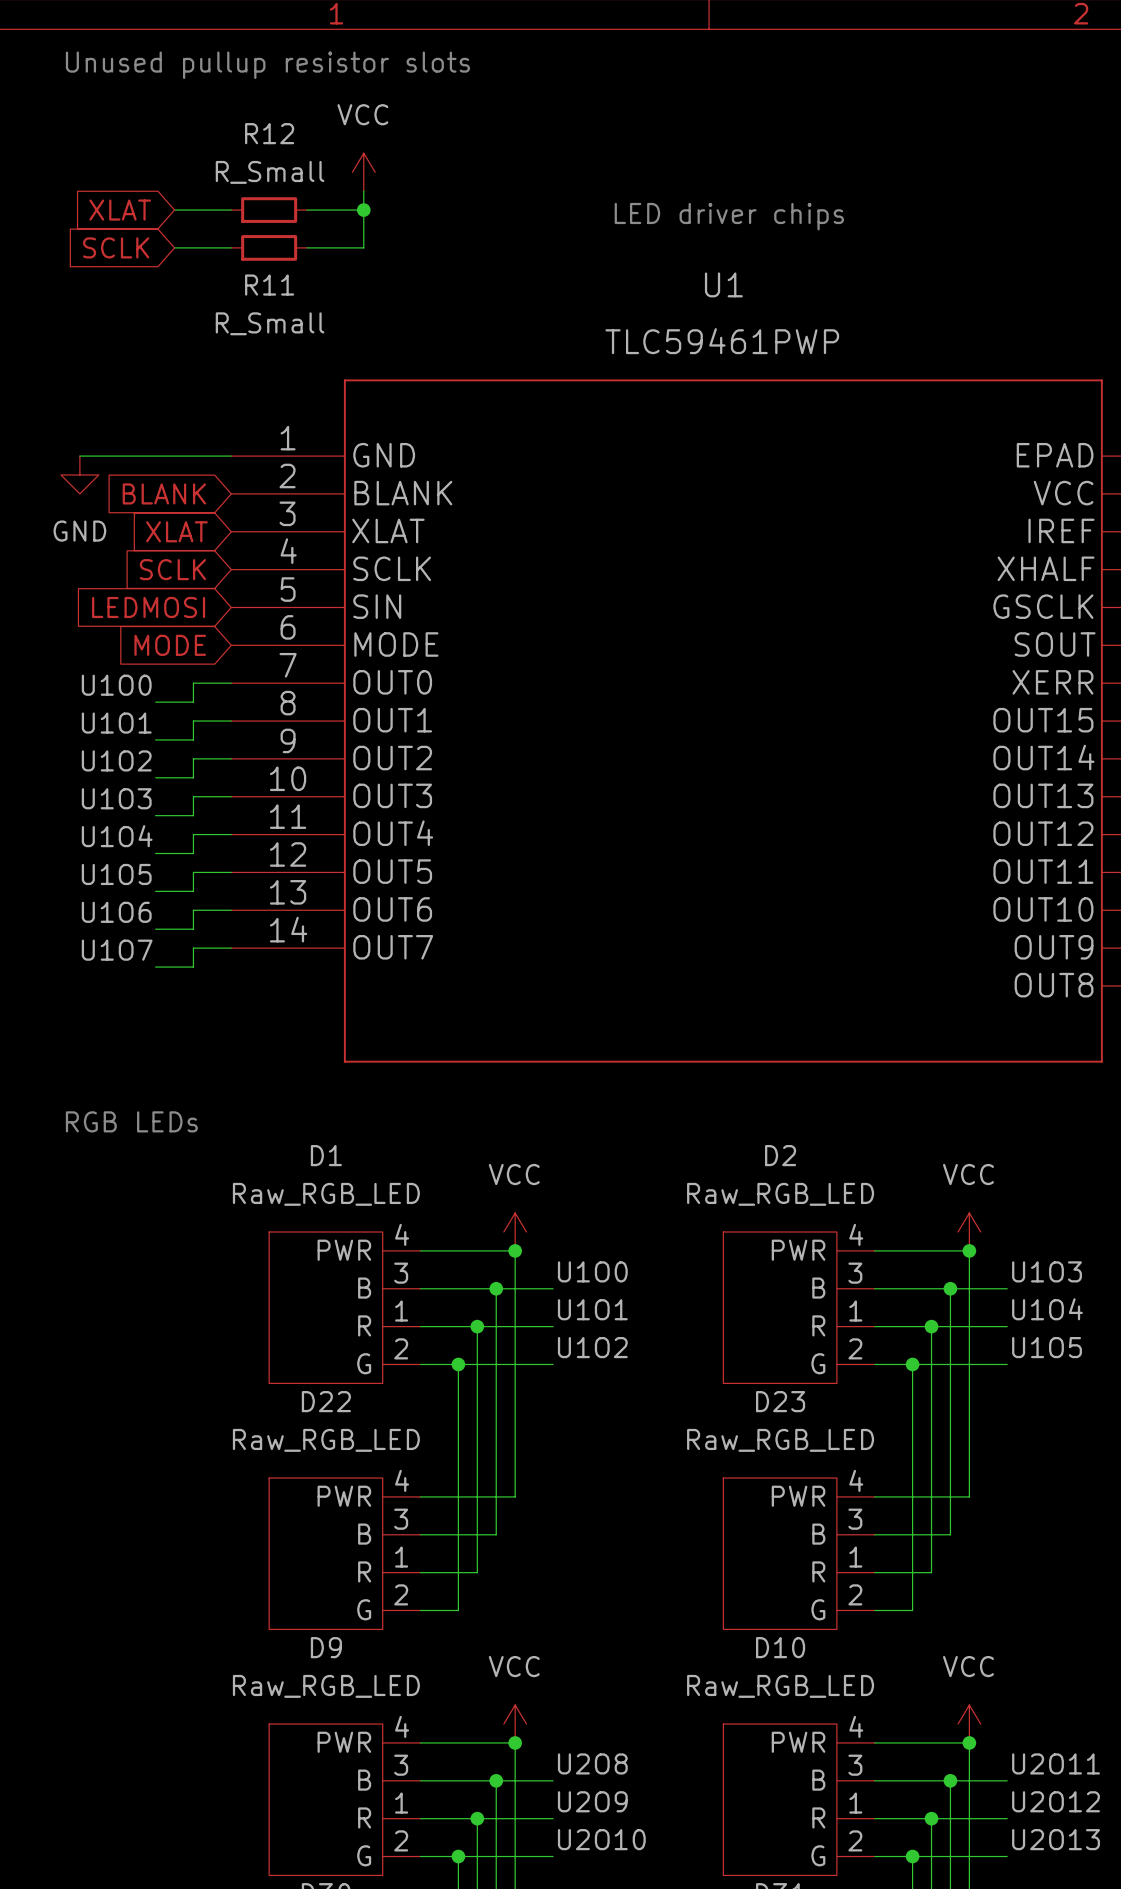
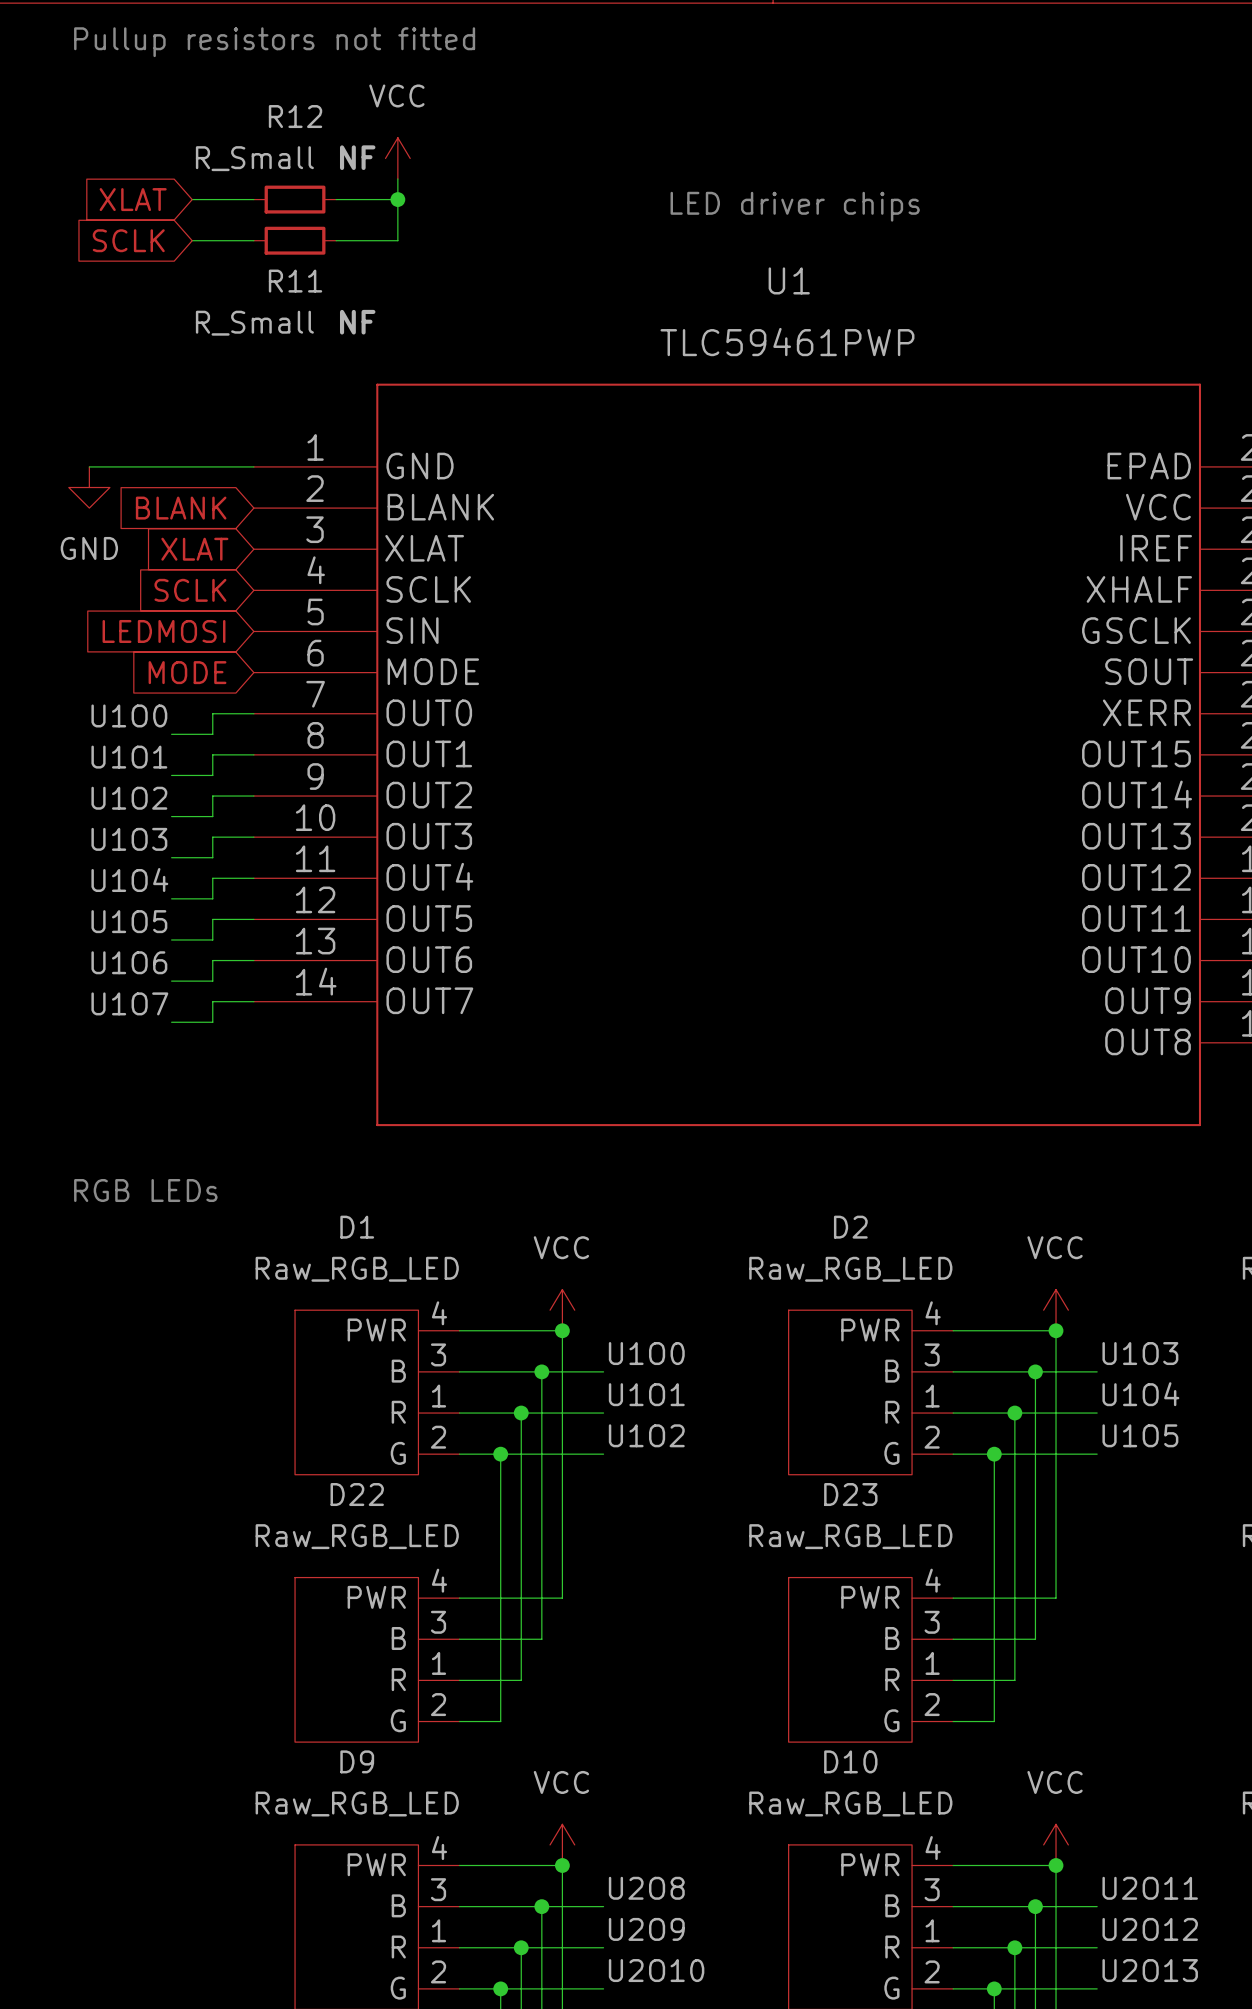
text: Unused pullup resistor slots (267, 65) -> Pullup resistors not fitted (274, 42)
R12 text: none -> NF (357, 157)
R12 value position: R_Small (270, 172) -> R_Small (254, 158)
R11 text: none -> NF (357, 322)
R11 value position: R_Small (270, 323) -> R_Small (254, 323)

